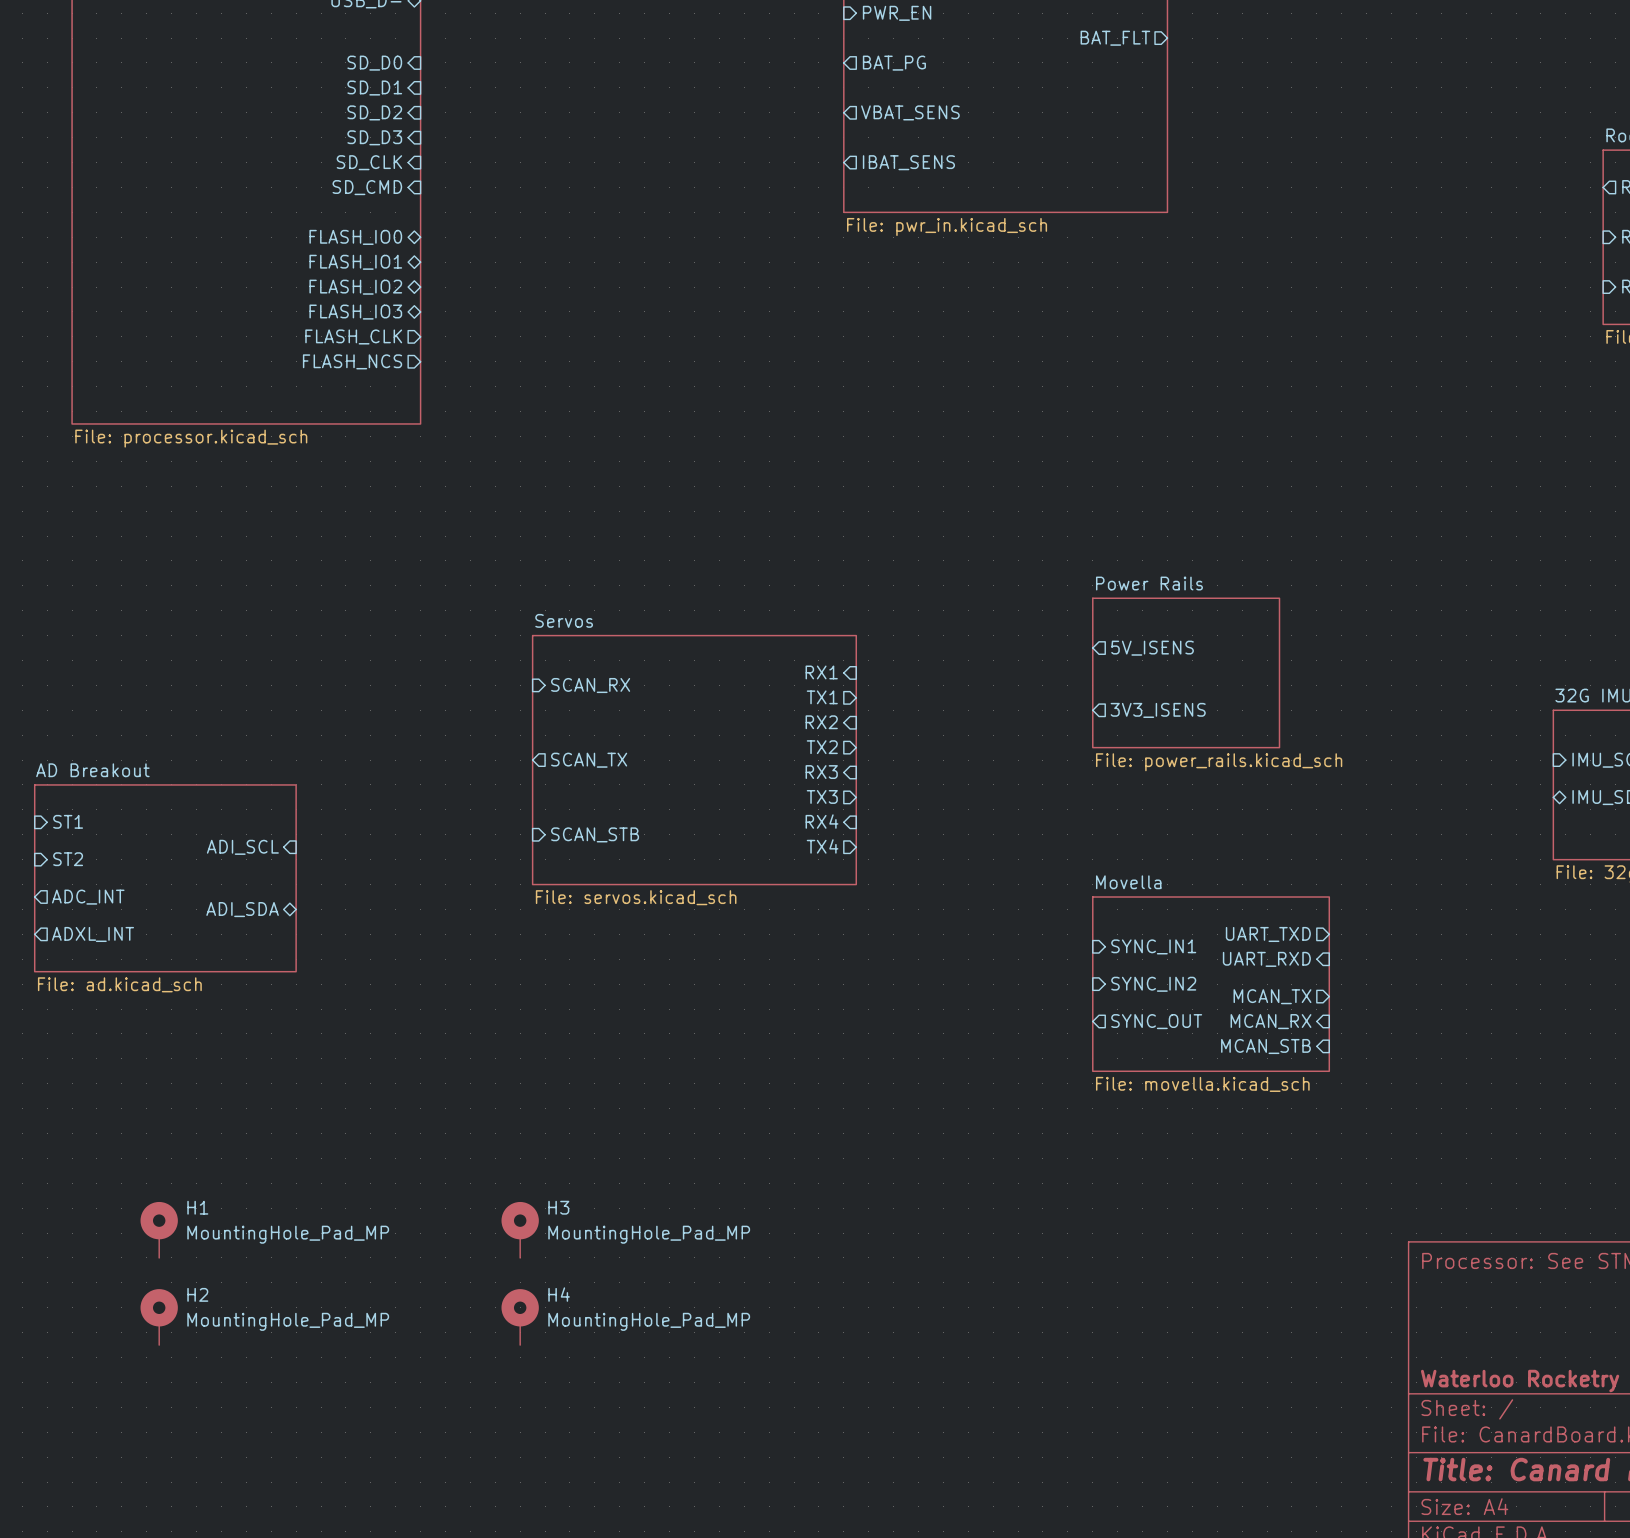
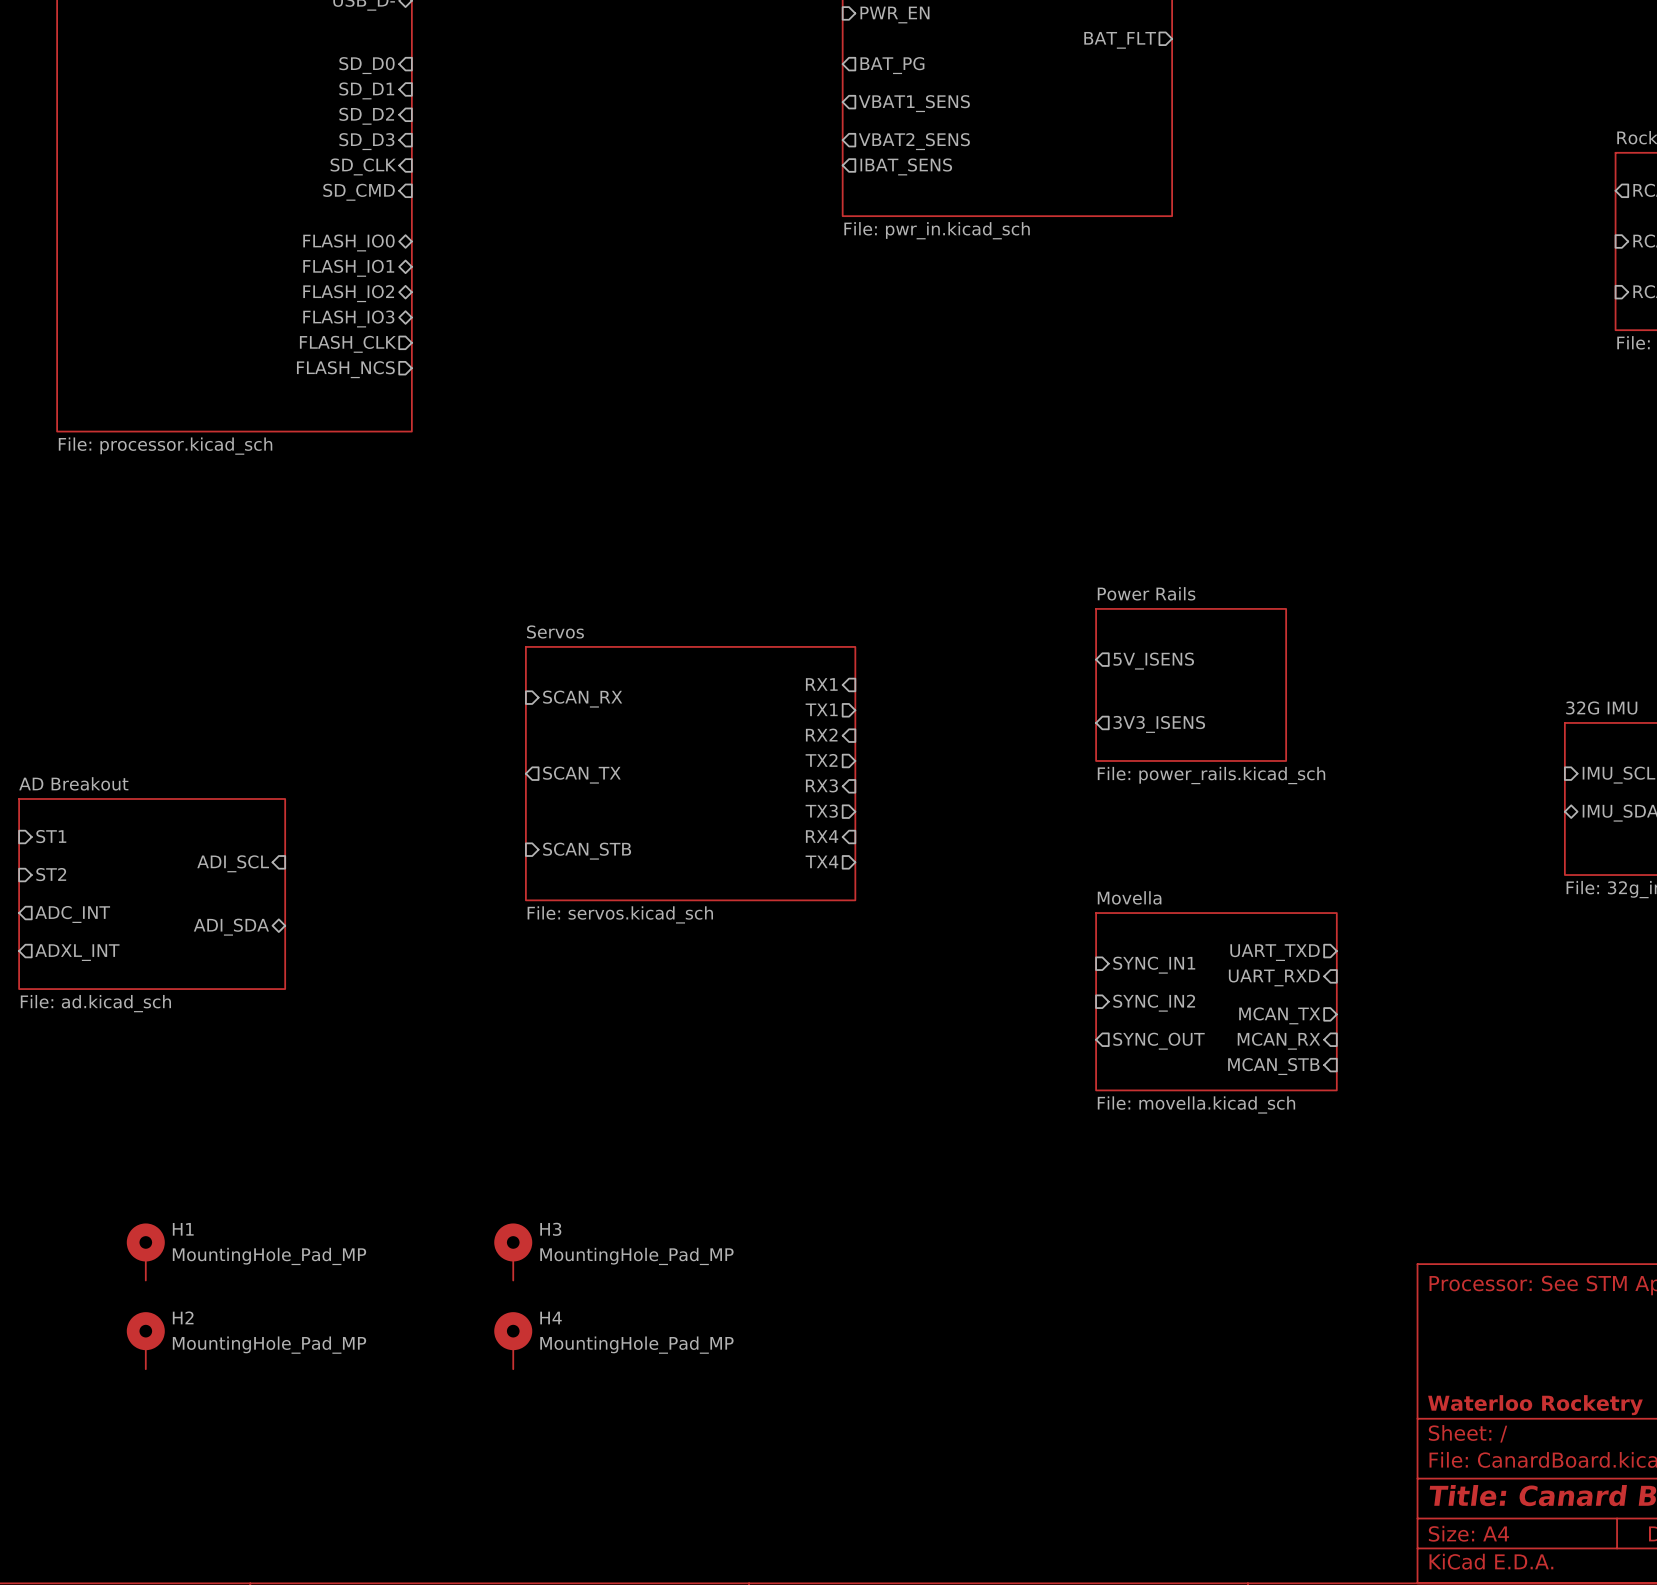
sheet pin: none -> VBAT1_SENS (914, 103)
sheet pin: VBAT_SENS (910, 112) -> none
sheet pin: none -> VBAT2_SENS (914, 141)

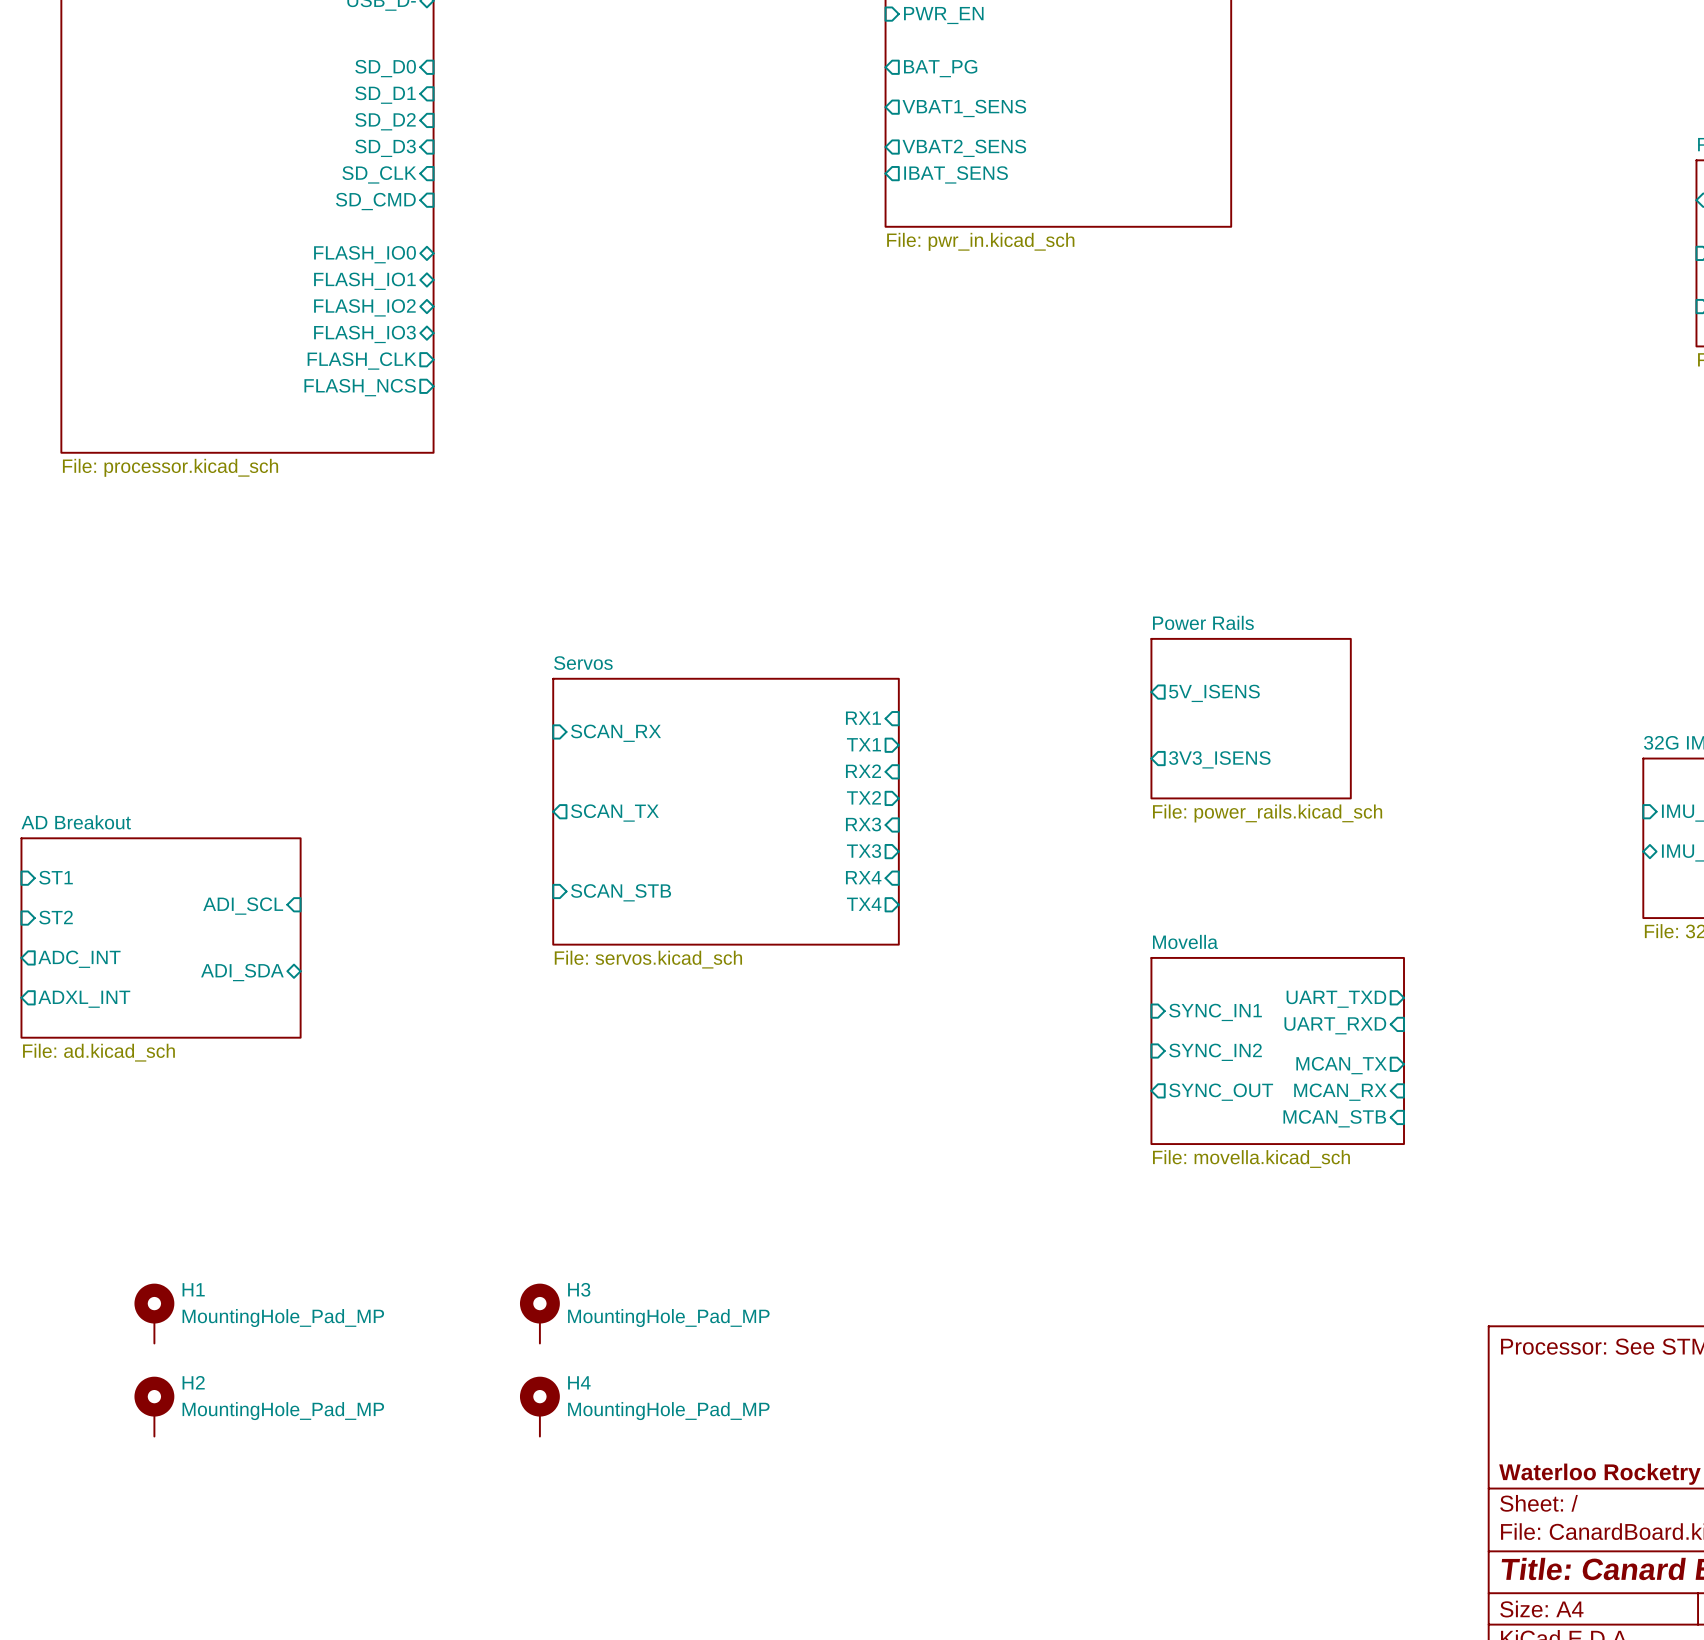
sheet pin: BAT_FLT (1120, 40) -> none

